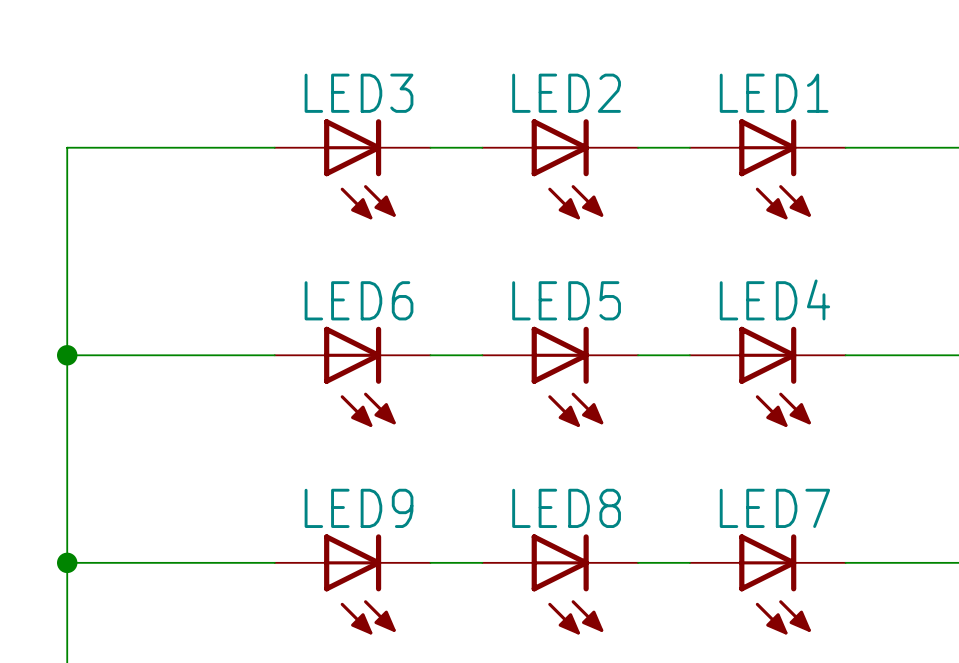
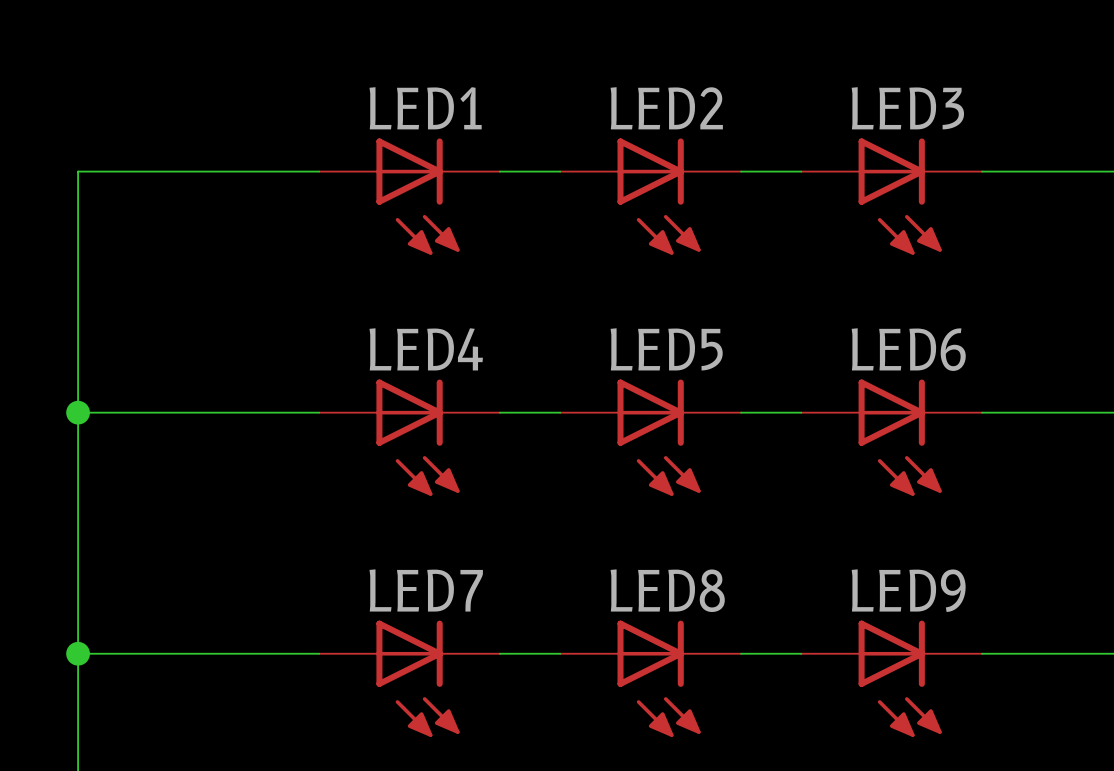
LED3 name: LED3 (359, 93) -> LED1 (425, 108)
LED1 name: LED1 (774, 93) -> LED3 (907, 108)
LED4 name: LED4 (774, 299) -> LED6 (908, 349)
LED6 name: LED6 (359, 300) -> LED4 (426, 349)
LED9 name: LED9 (359, 508) -> LED7 (426, 590)
LED7 name: LED7 (774, 508) -> LED9 (908, 590)

